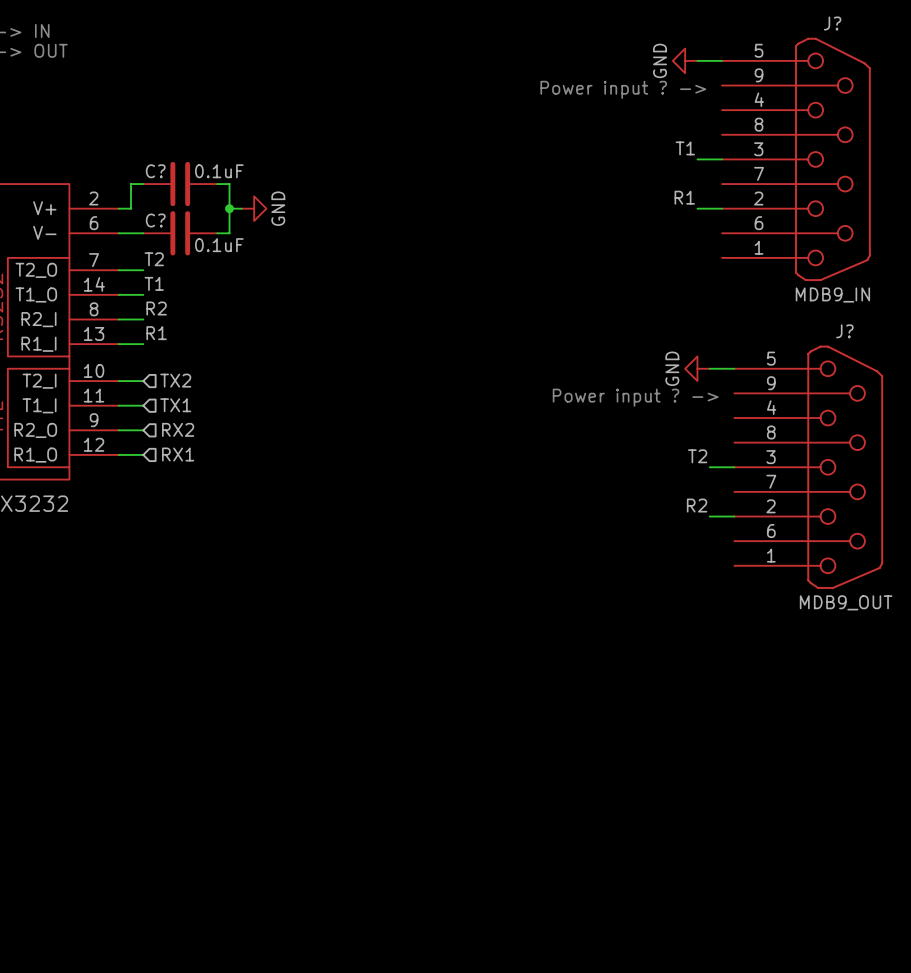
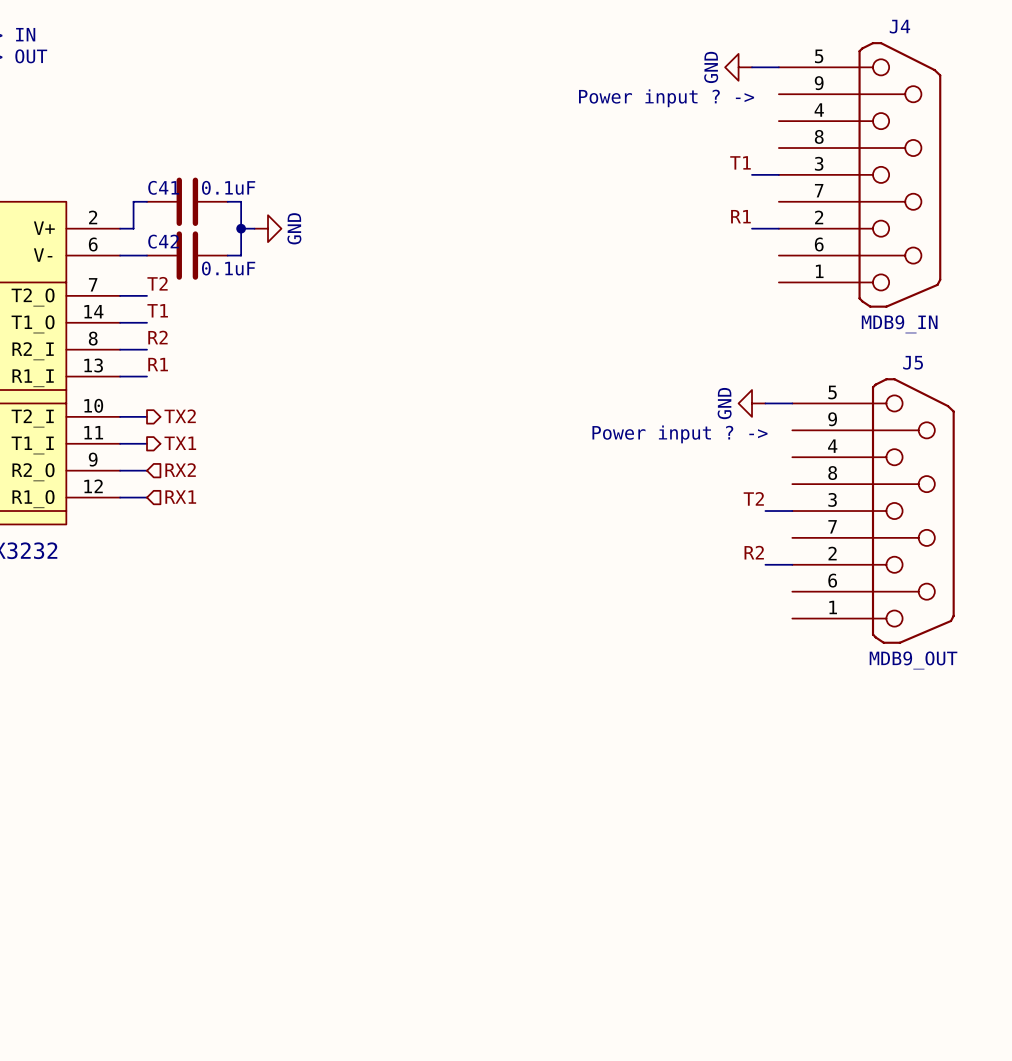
J? name: J? (832, 23) -> J4 (899, 26)
C? name: C? (155, 171) -> C41 (163, 187)
C? name: C? (155, 220) -> C42 (163, 241)
J? name: J? (844, 331) -> J5 (913, 362)
hierarchical label shape: input (175, 380) -> output (180, 416)
hierarchical label shape: input (175, 405) -> output (180, 443)

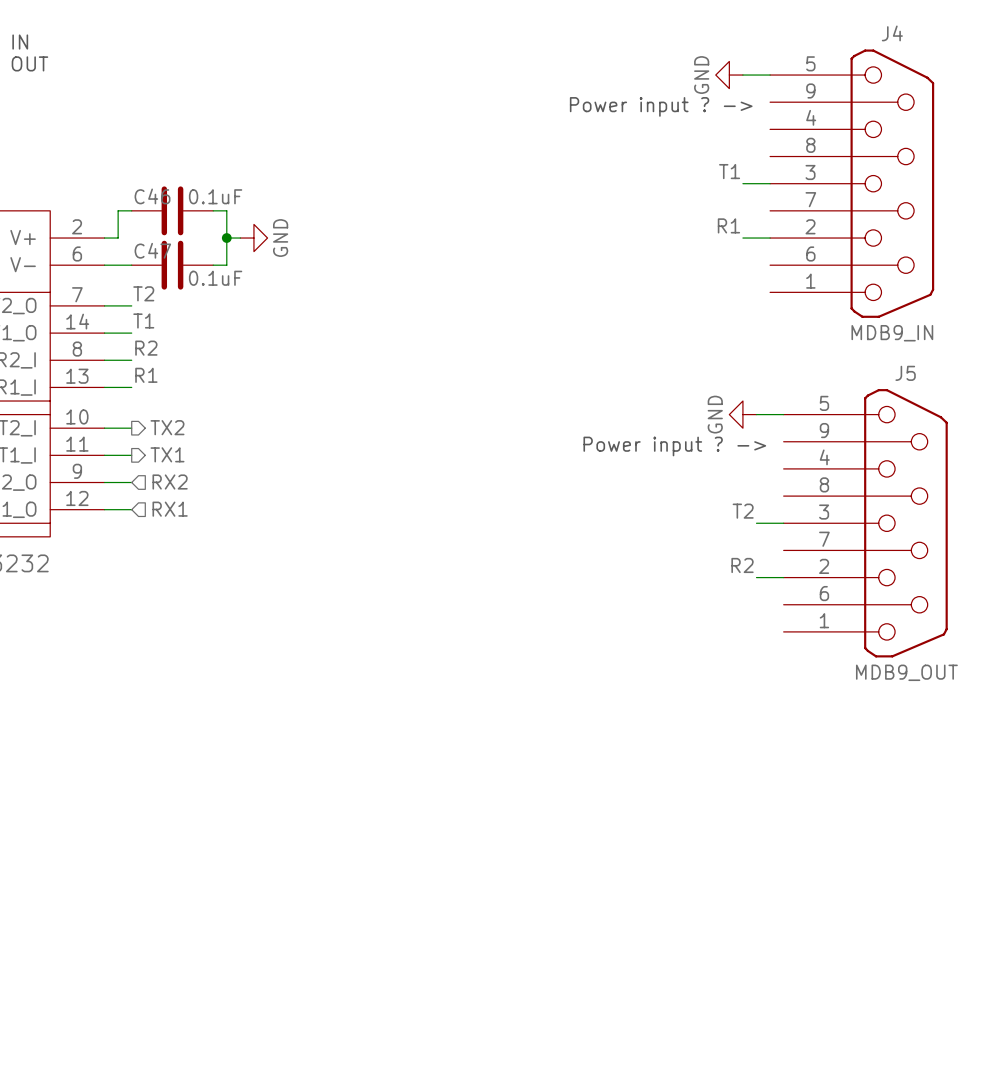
C41 name: C41 (163, 187) -> C46 (152, 196)
C42 name: C42 (163, 241) -> C47 (152, 250)

